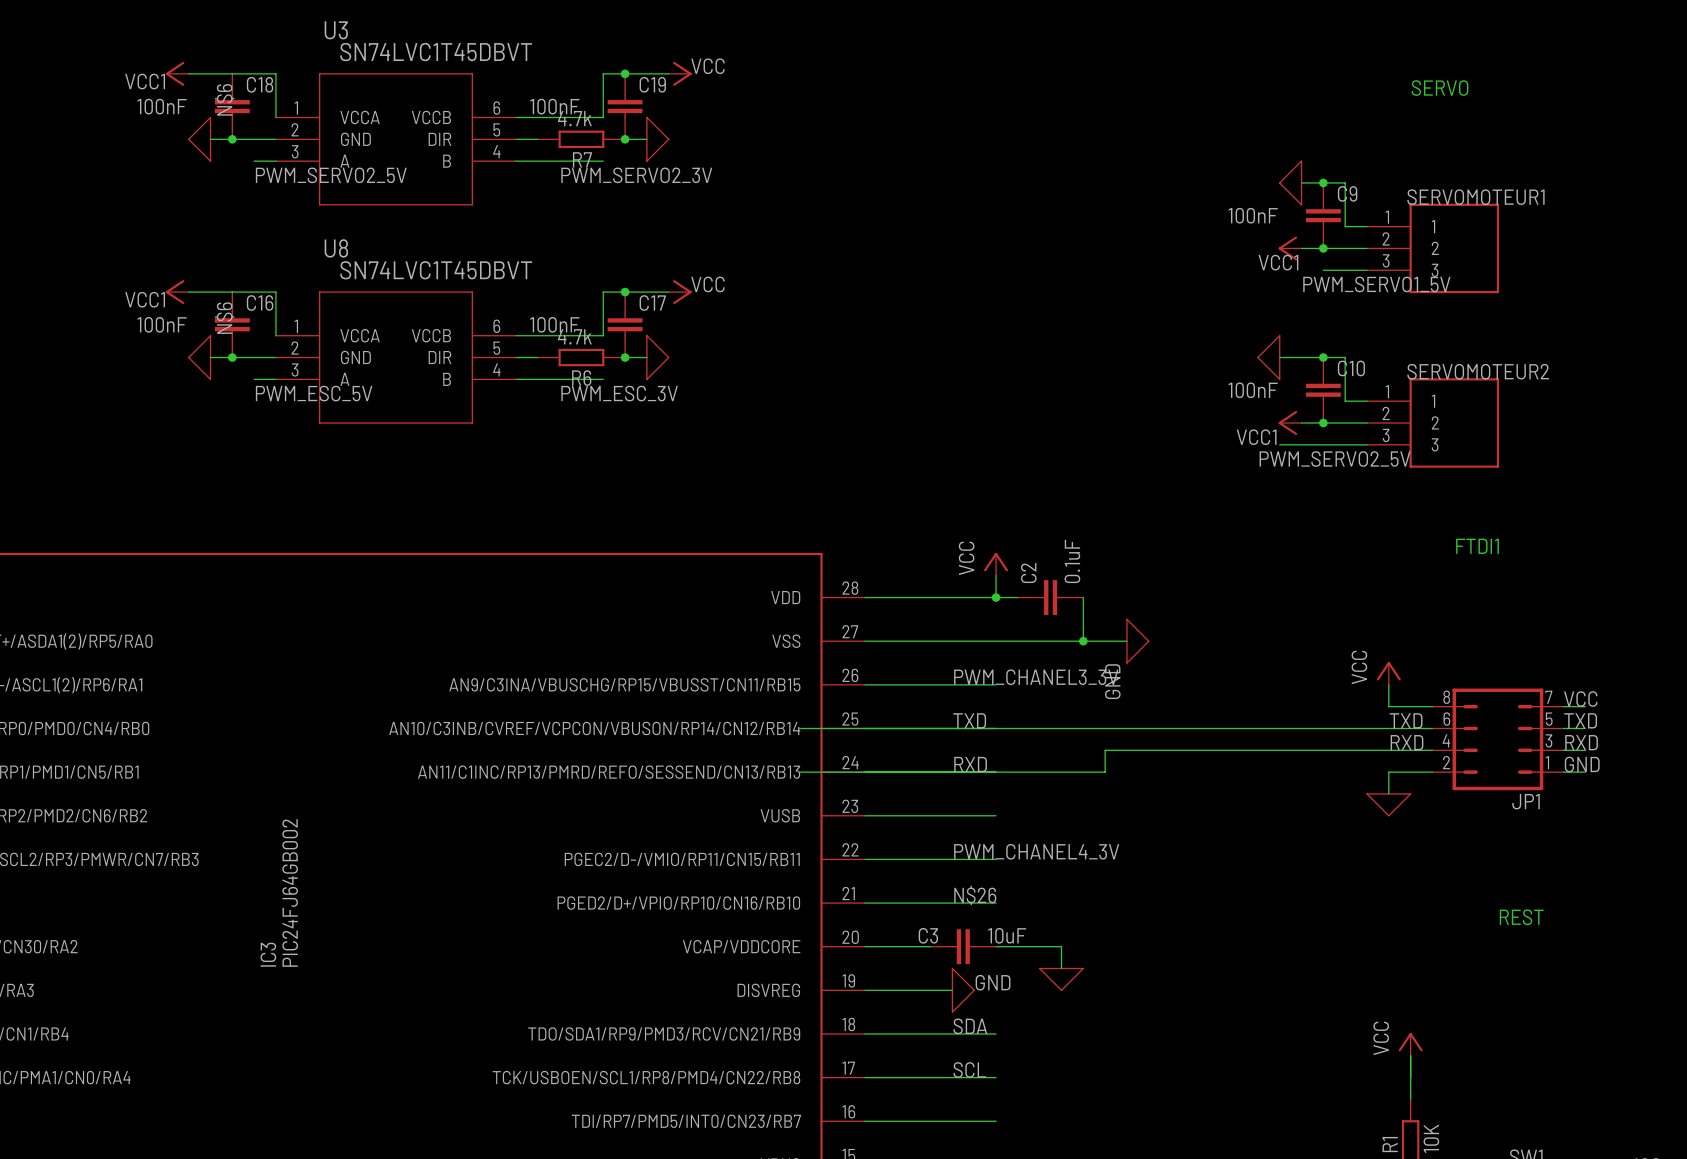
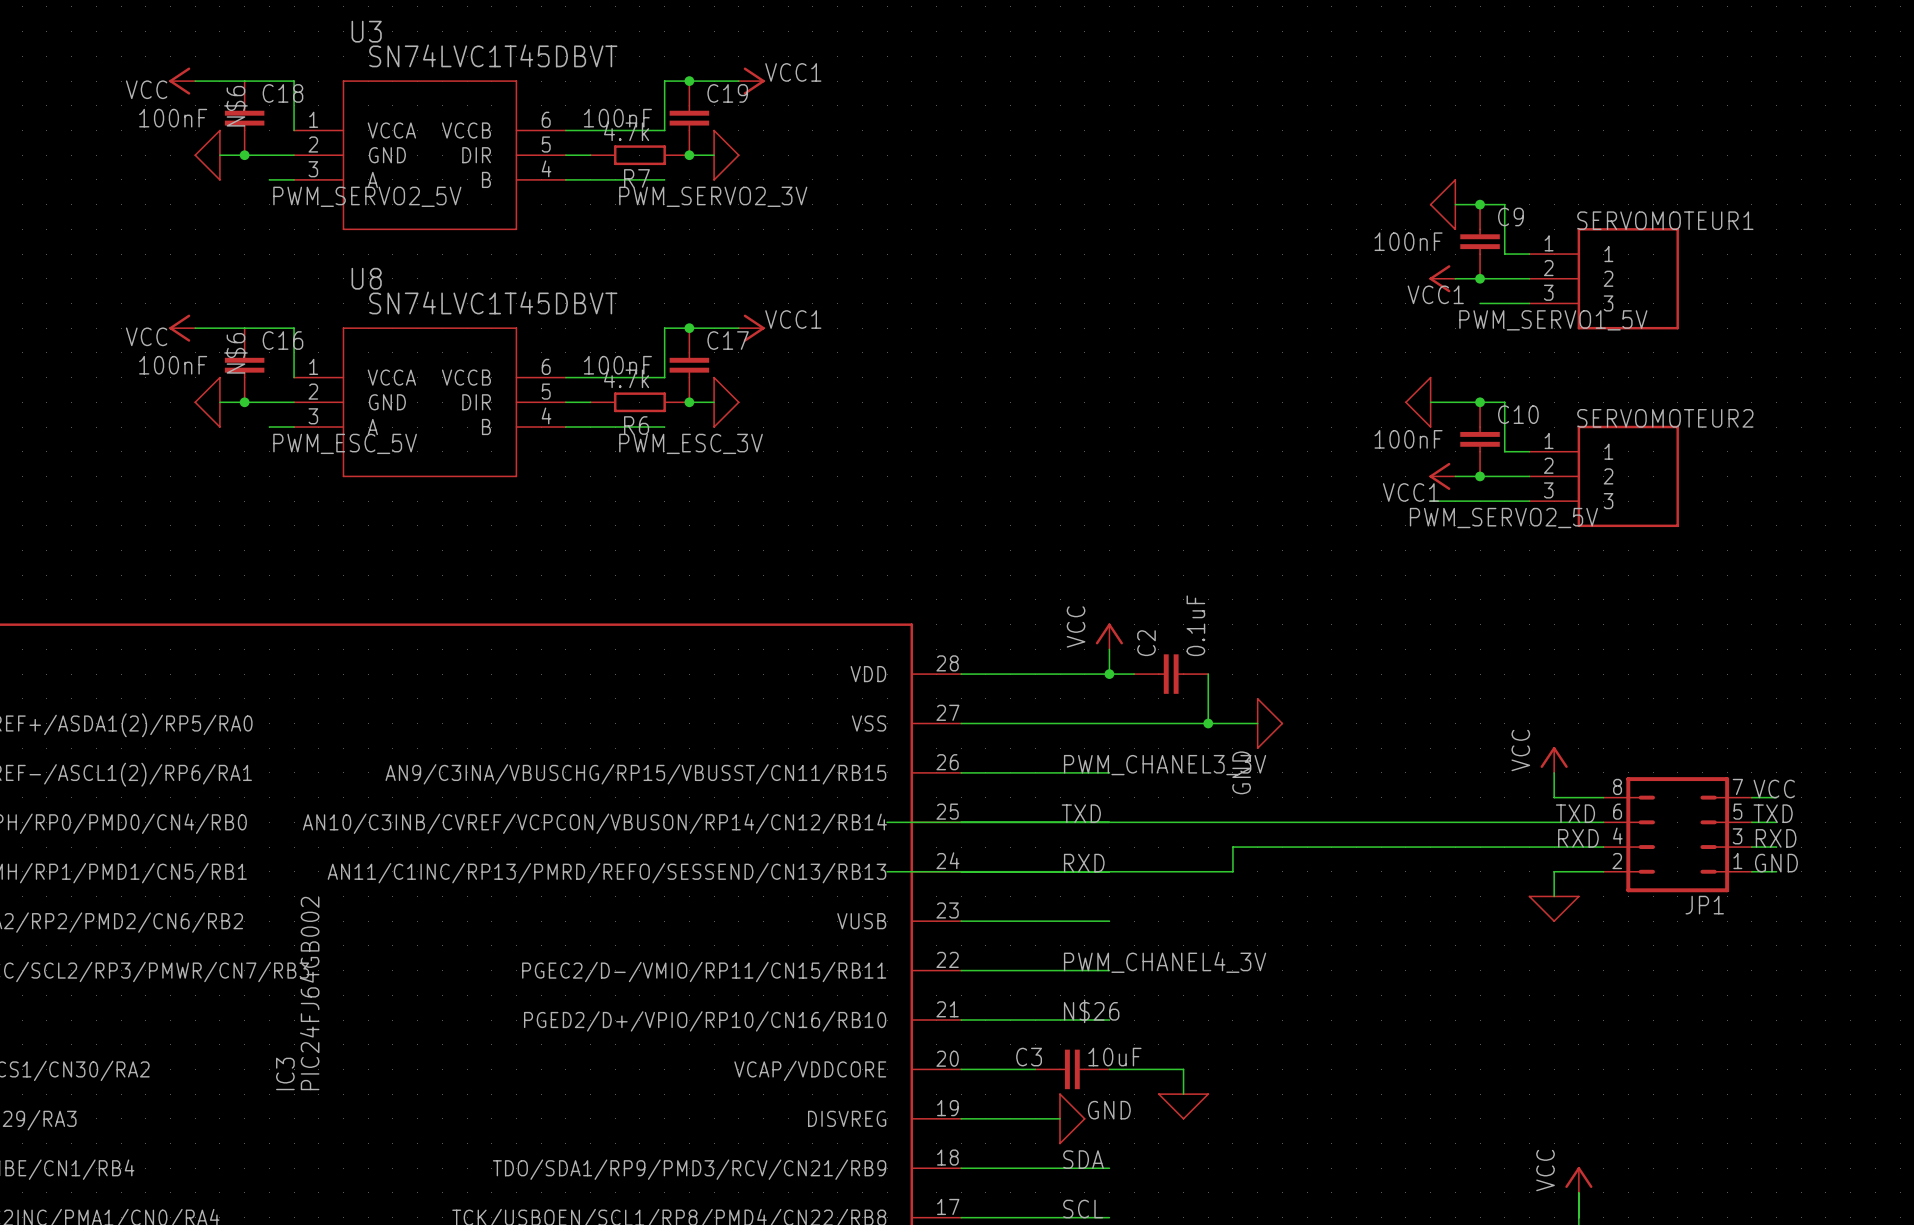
power symbol: VCC1 (177, 73) -> VCC (182, 81)
power symbol: VCC (680, 73) -> VCC1 (751, 81)
text: SERVO (1440, 88) -> none
power symbol: VCC1 (177, 292) -> VCC (182, 328)
power symbol: VCC (680, 292) -> VCC1 (751, 328)
text: FTDI1 (1477, 546) -> none
text: REST (1521, 917) -> none

